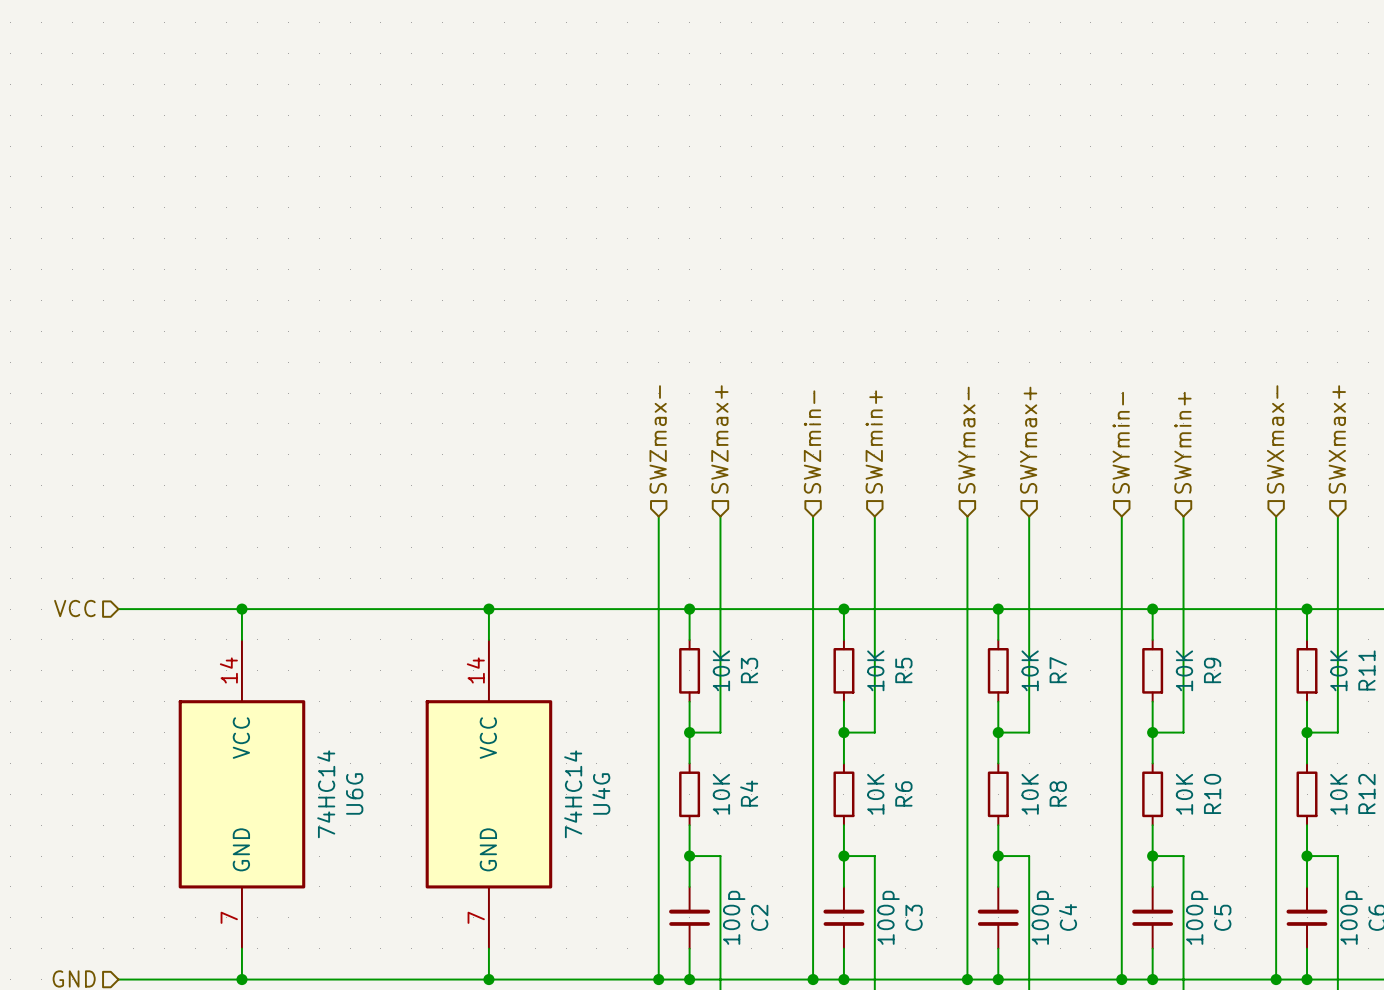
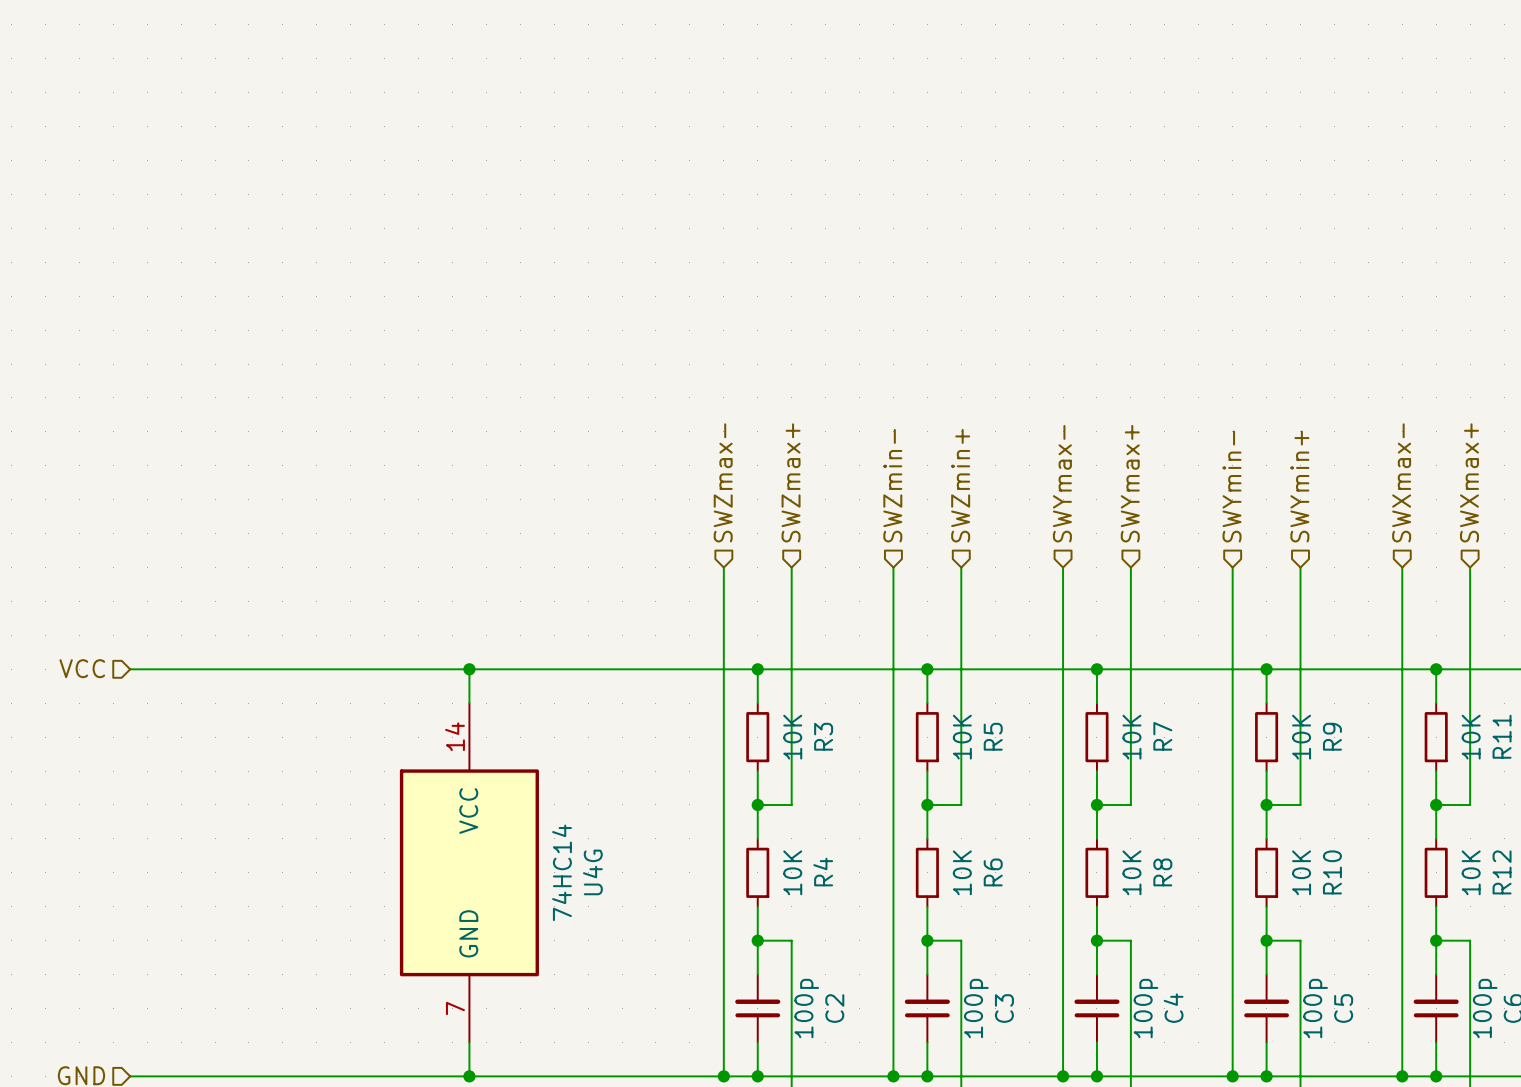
wire: (241, 609) (241, 639) -> none
junction: (241, 609) -> none
wire: (488, 609) (488, 639) -> (469, 669) (469, 703)
junction position: (488, 609) -> (469, 669)
U6G: 74HC14 (241, 794) -> none
U4G position: (488, 794) -> (469, 872)
wire: (241, 948) (241, 979) -> none
wire: (488, 948) (488, 979) -> (469, 1042) (469, 1076)
junction: (241, 979) -> none
junction position: (488, 979) -> (469, 1076)

